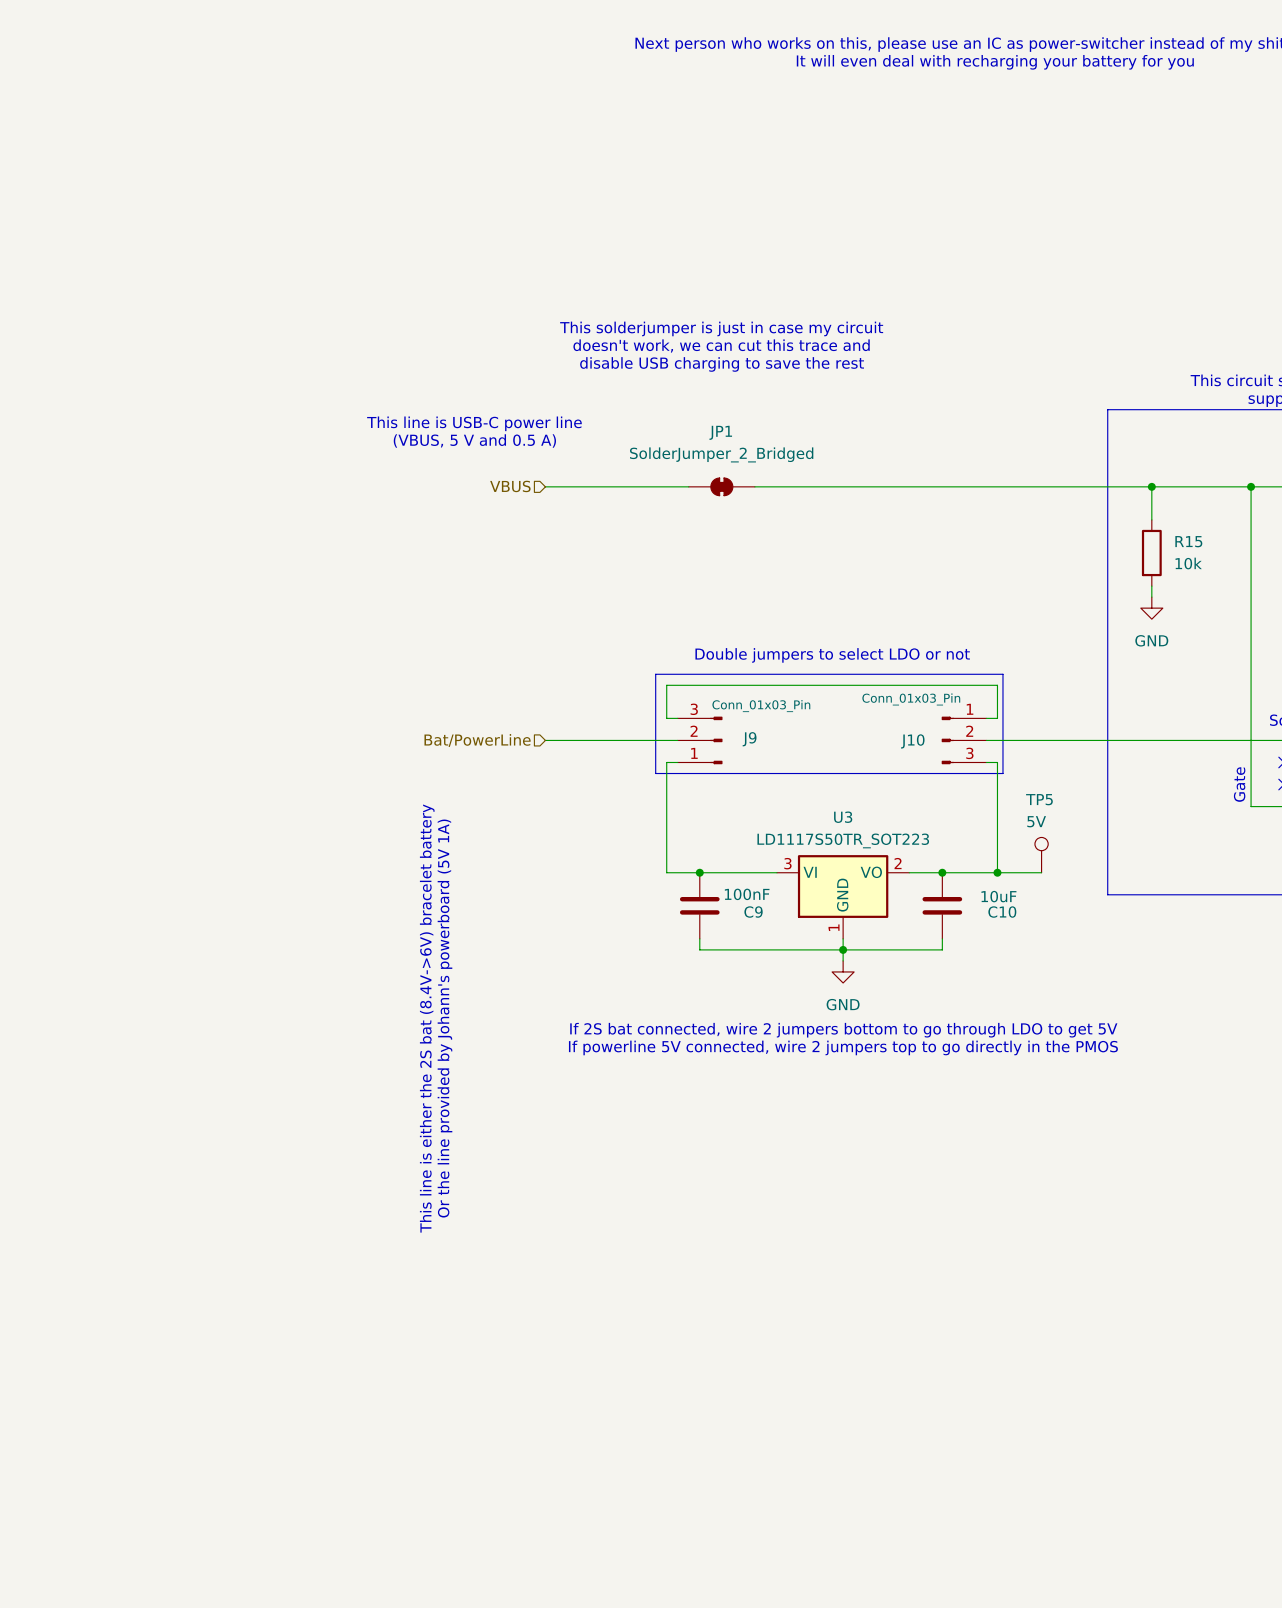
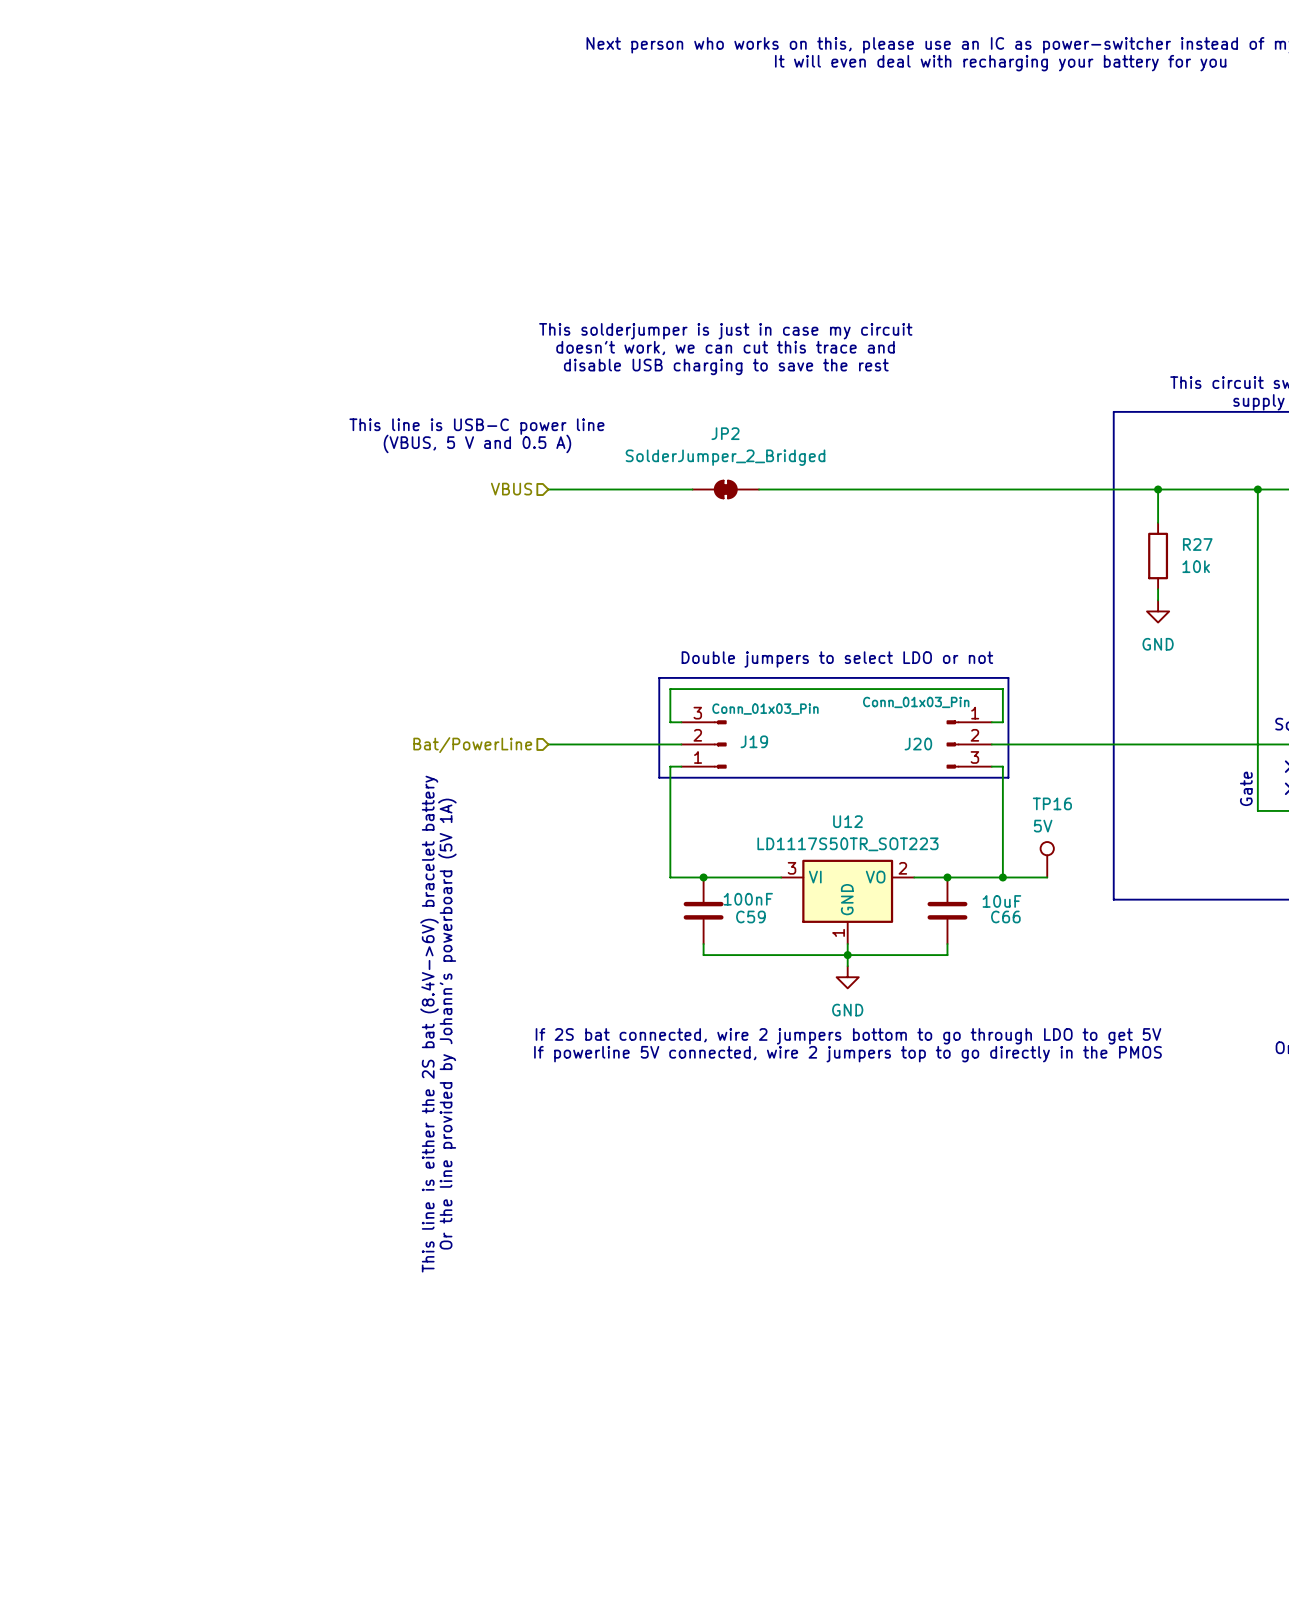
JP1 name: JP1 (720, 432) -> JP2 (725, 433)
R15 name: R15 (1188, 541) -> R27 (1197, 544)
J9 name: J9 (749, 739) -> J19 (754, 741)
J10 name: J10 (912, 741) -> J20 (918, 744)
TP5 name: TP5 (1039, 799) -> TP16 (1052, 803)
U3 name: U3 (843, 817) -> U12 (847, 821)
C9 name: C9 (753, 912) -> C59 (750, 916)
C10 name: C10 (1002, 912) -> C66 (1005, 916)

